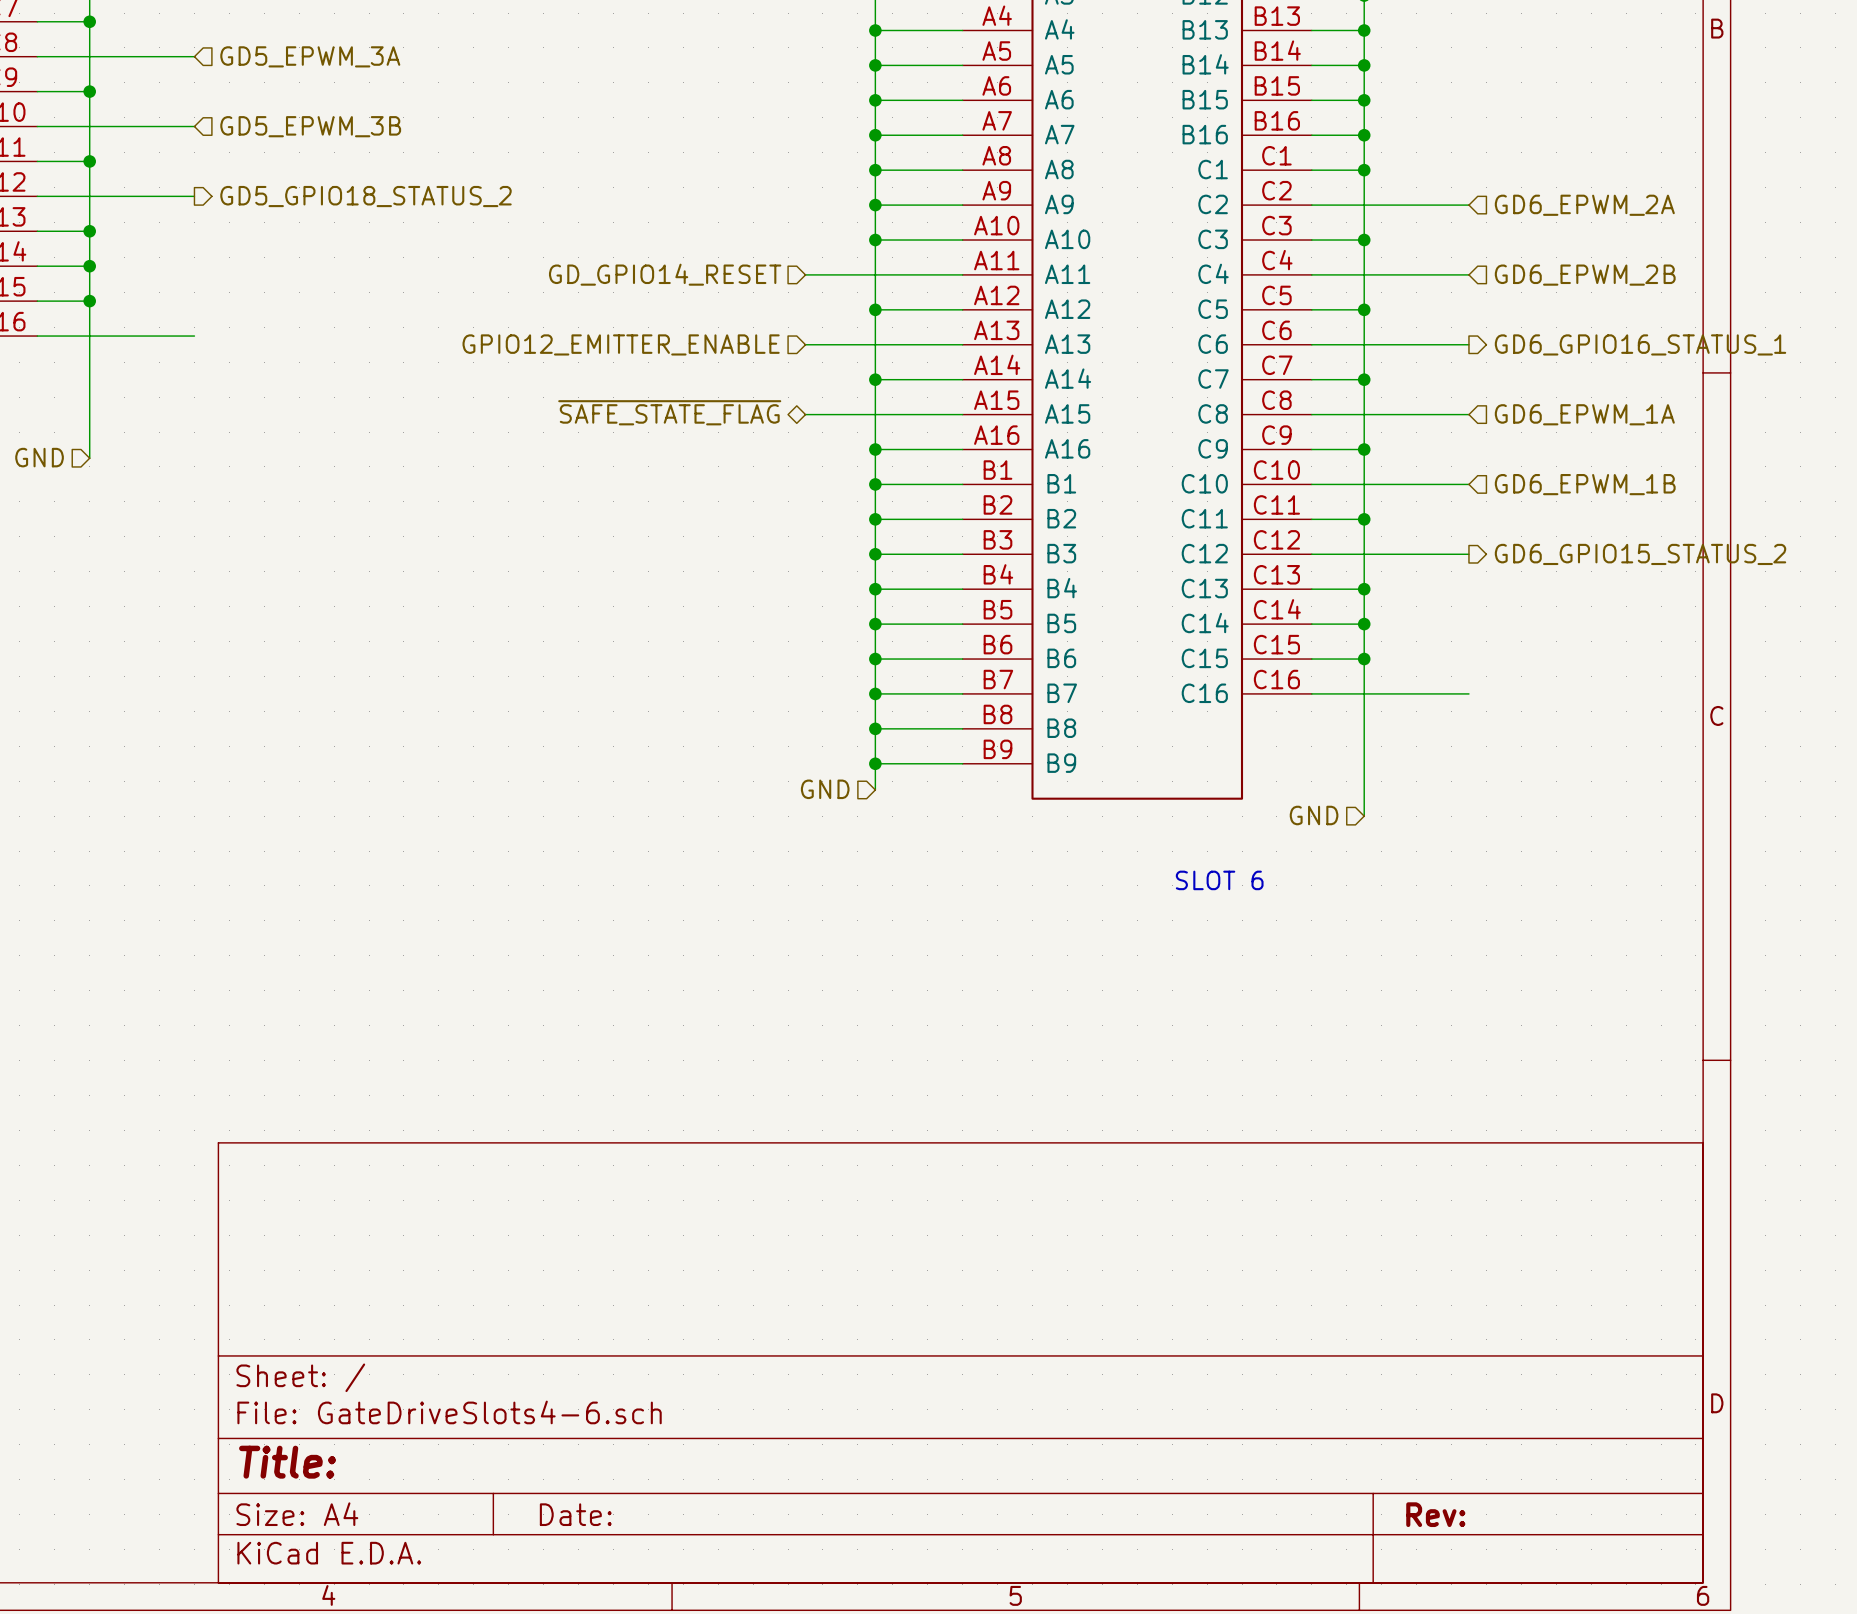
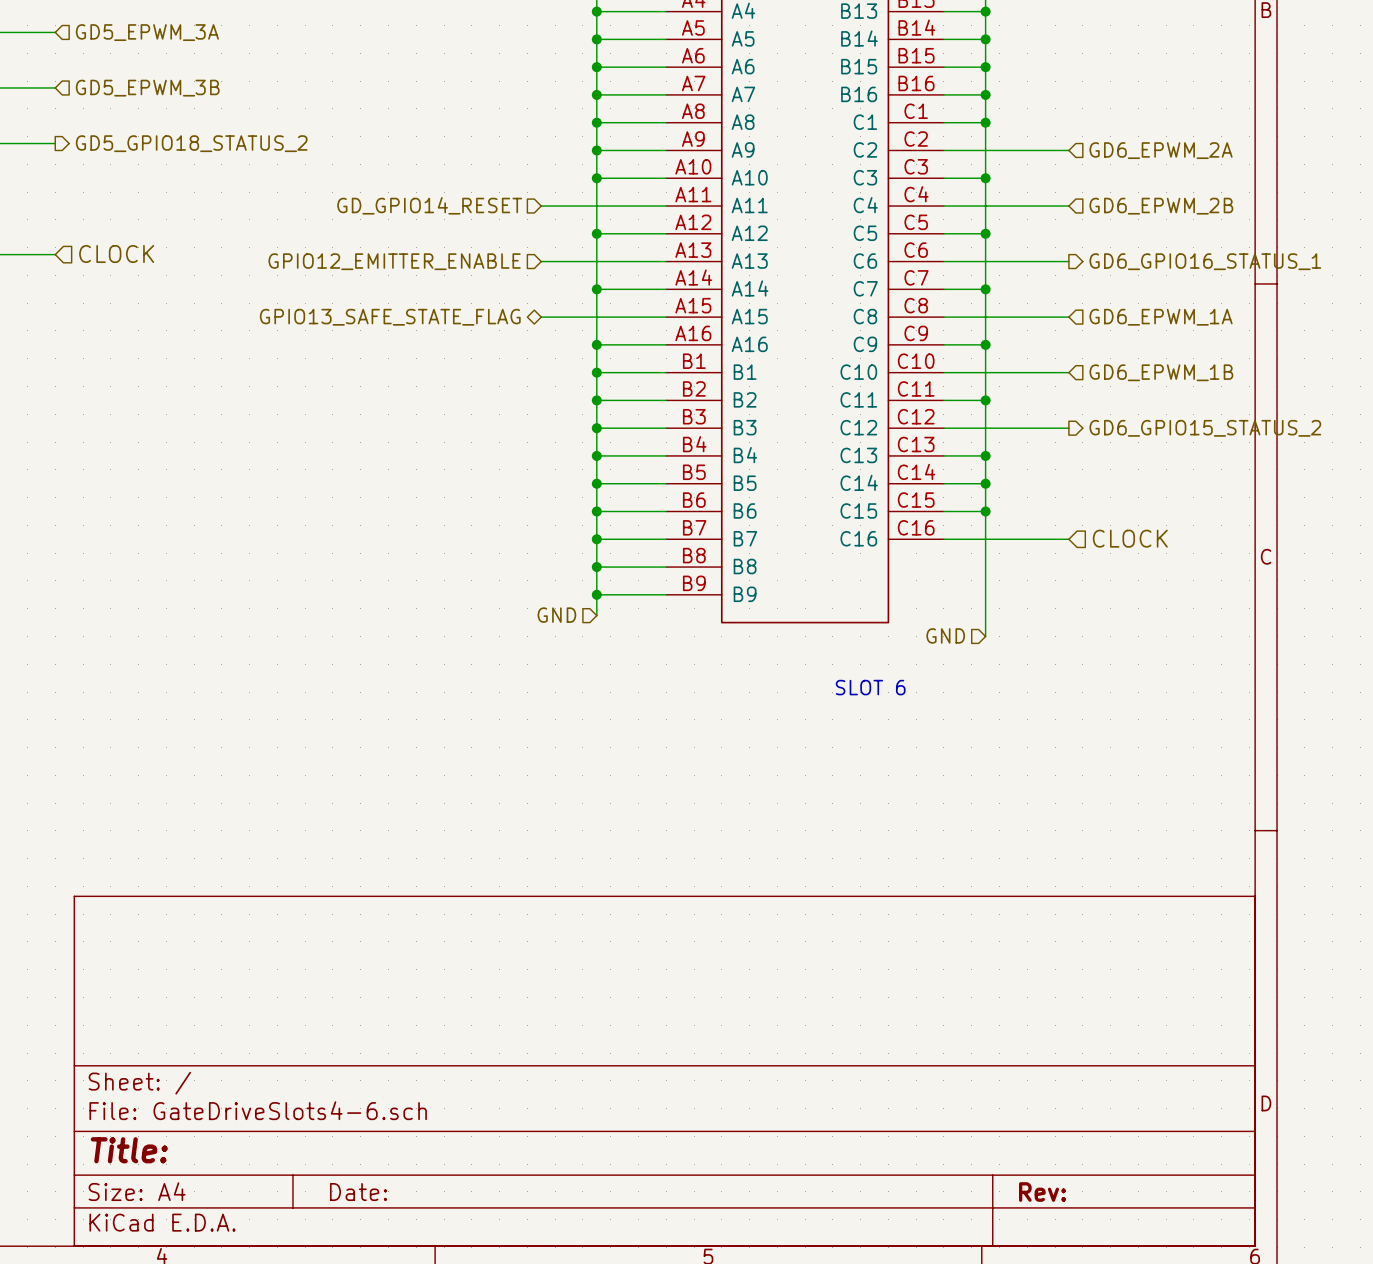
hierarchical label: none -> CLOCK (116, 254)
hierarchical label: ~{SAFE_STATE_FLAG} (669, 412) -> GPIO13_SAFE_STATE_FLAG (390, 317)
hierarchical label: none -> CLOCK (1130, 538)

